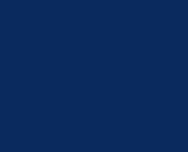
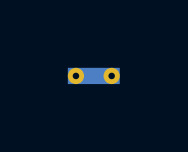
part: none -> (93, 75)

